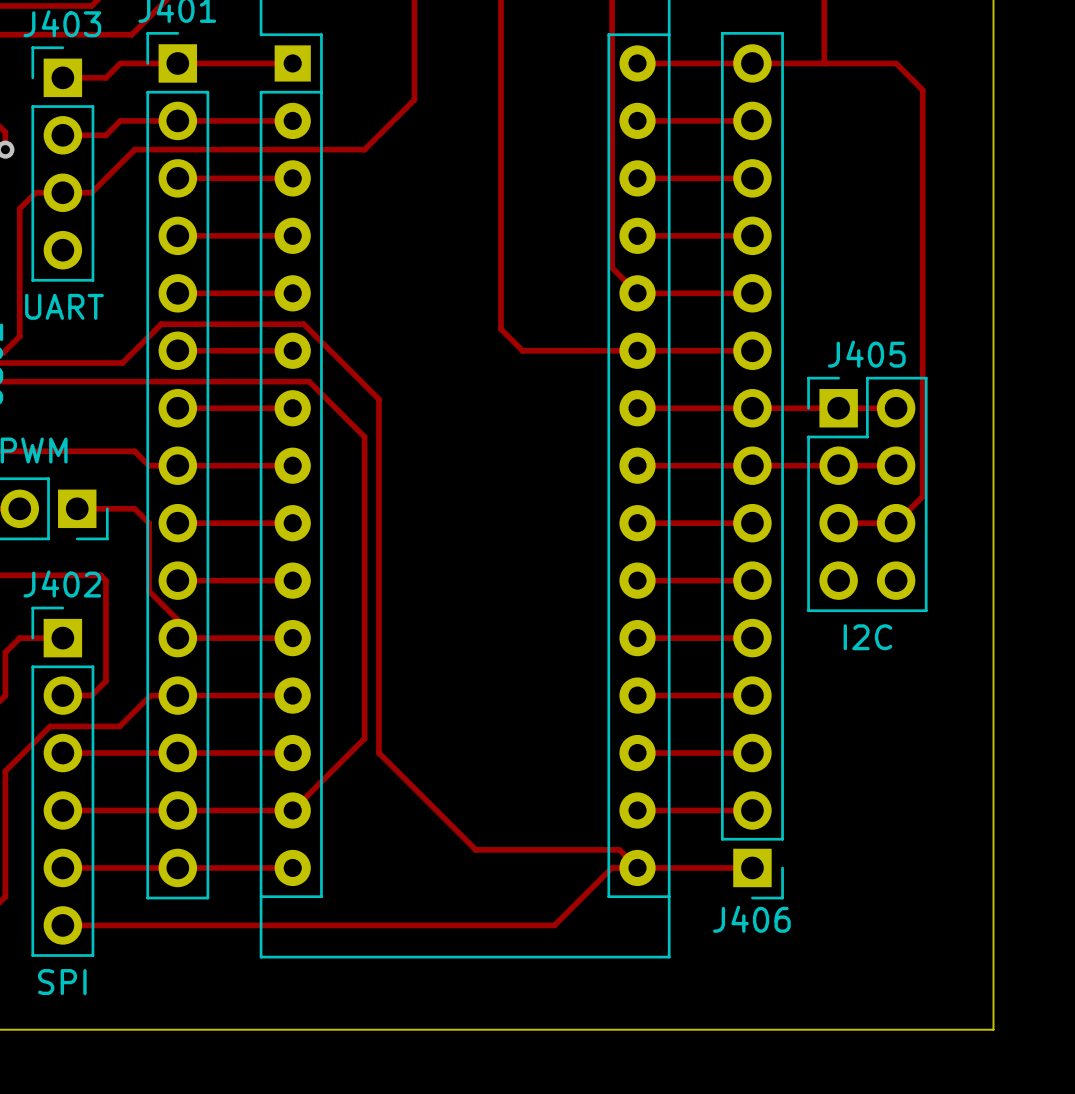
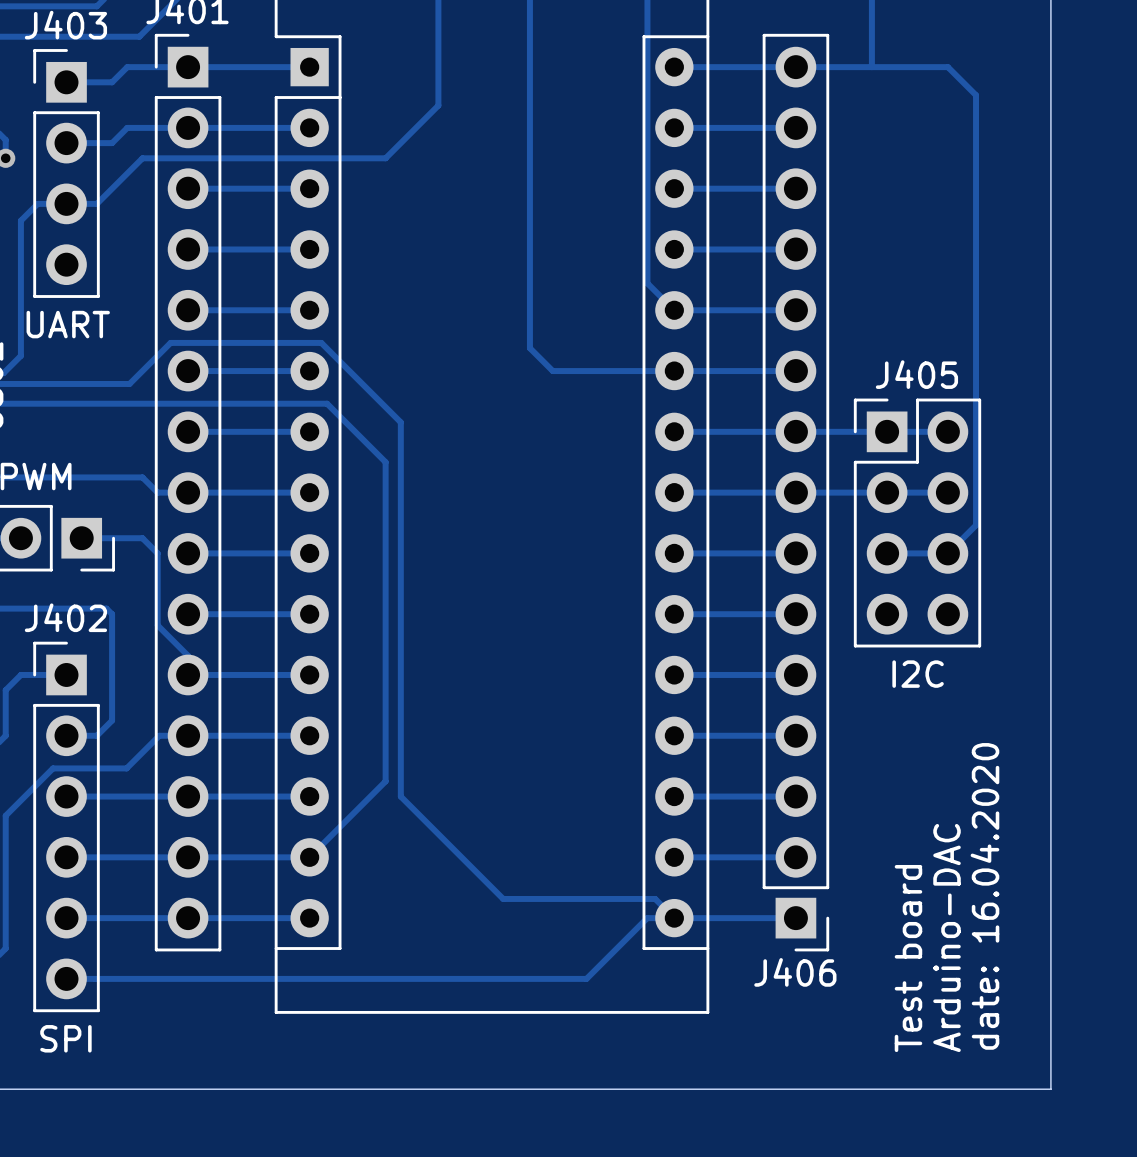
text: none -> date: 16.04.2020 (984, 896)
text: none -> Arduino-DAC (947, 938)
text: none -> Test board (908, 958)

